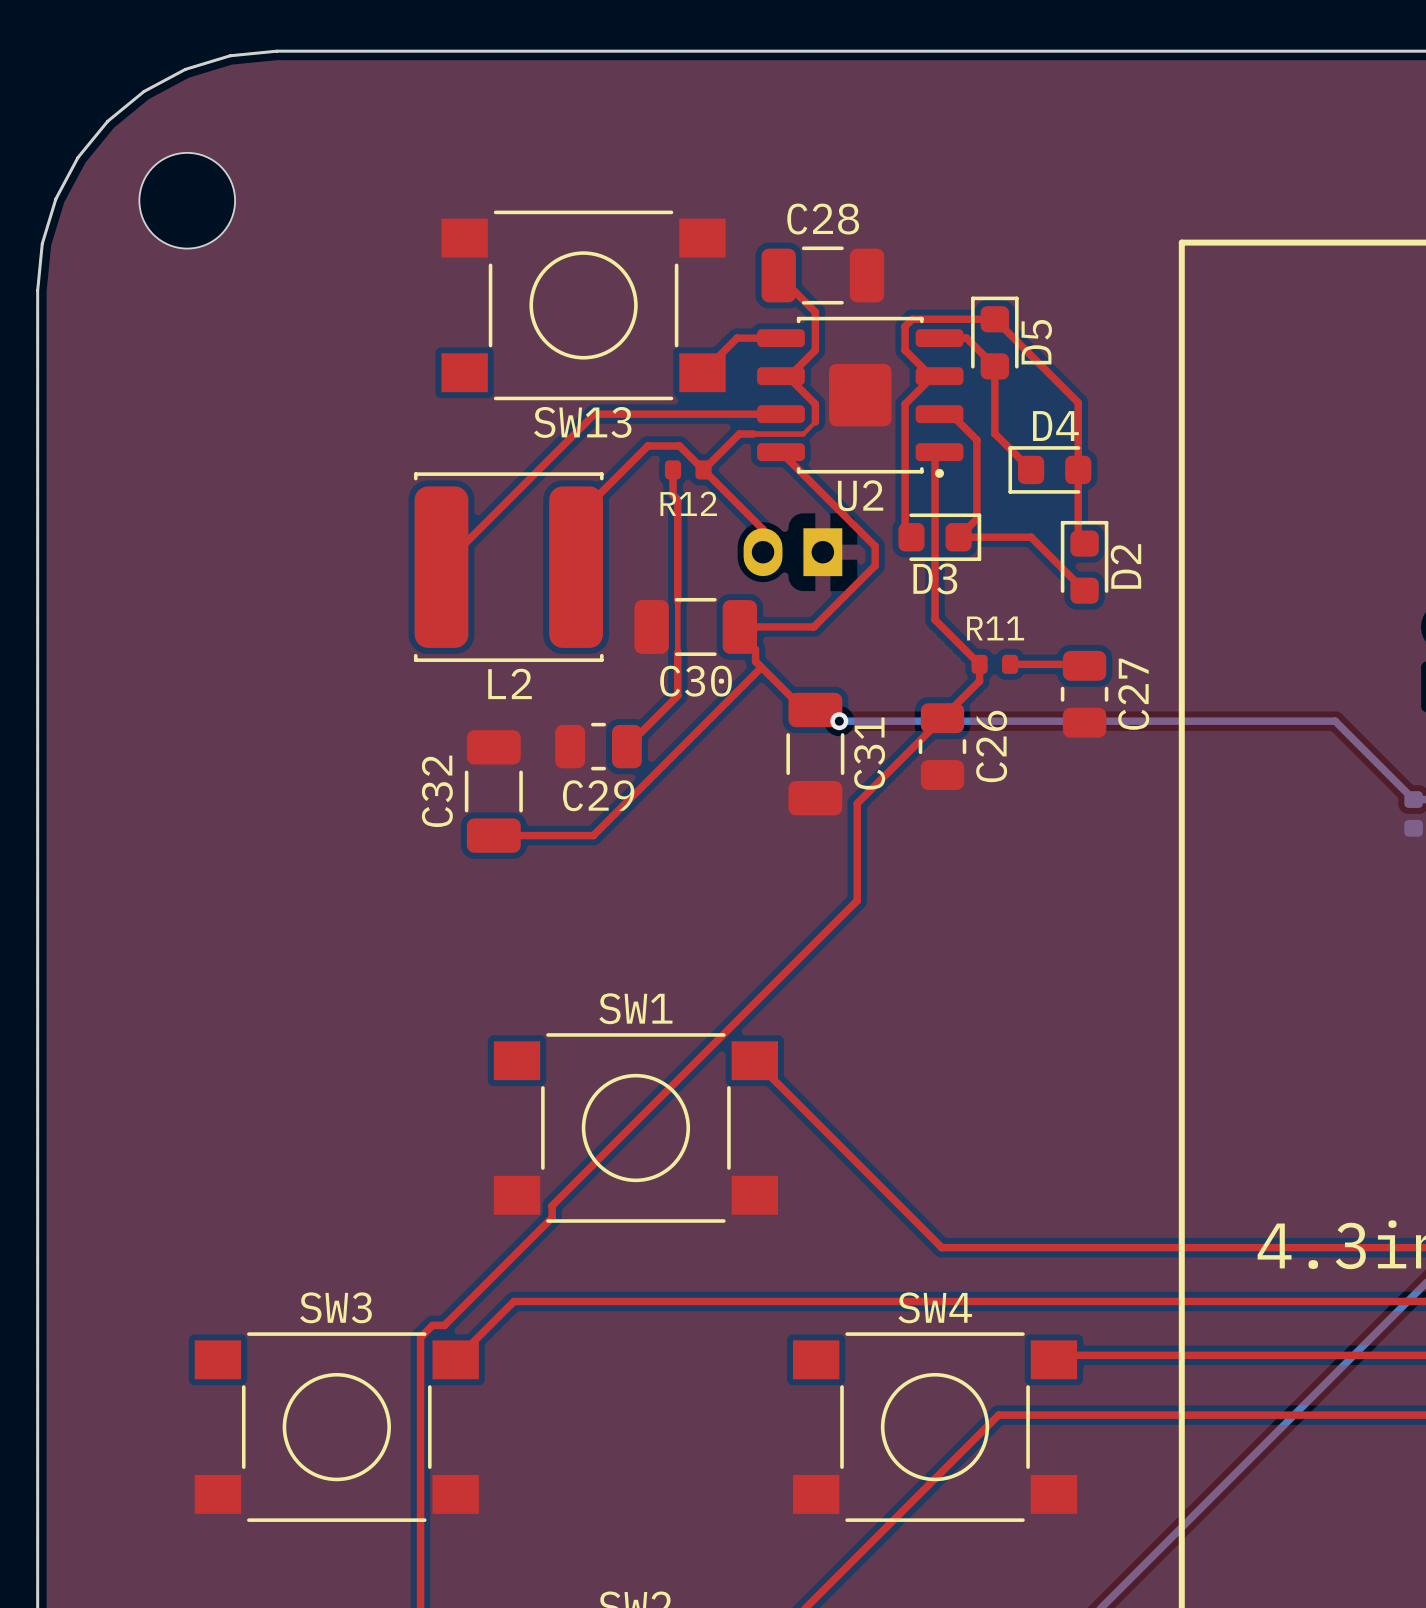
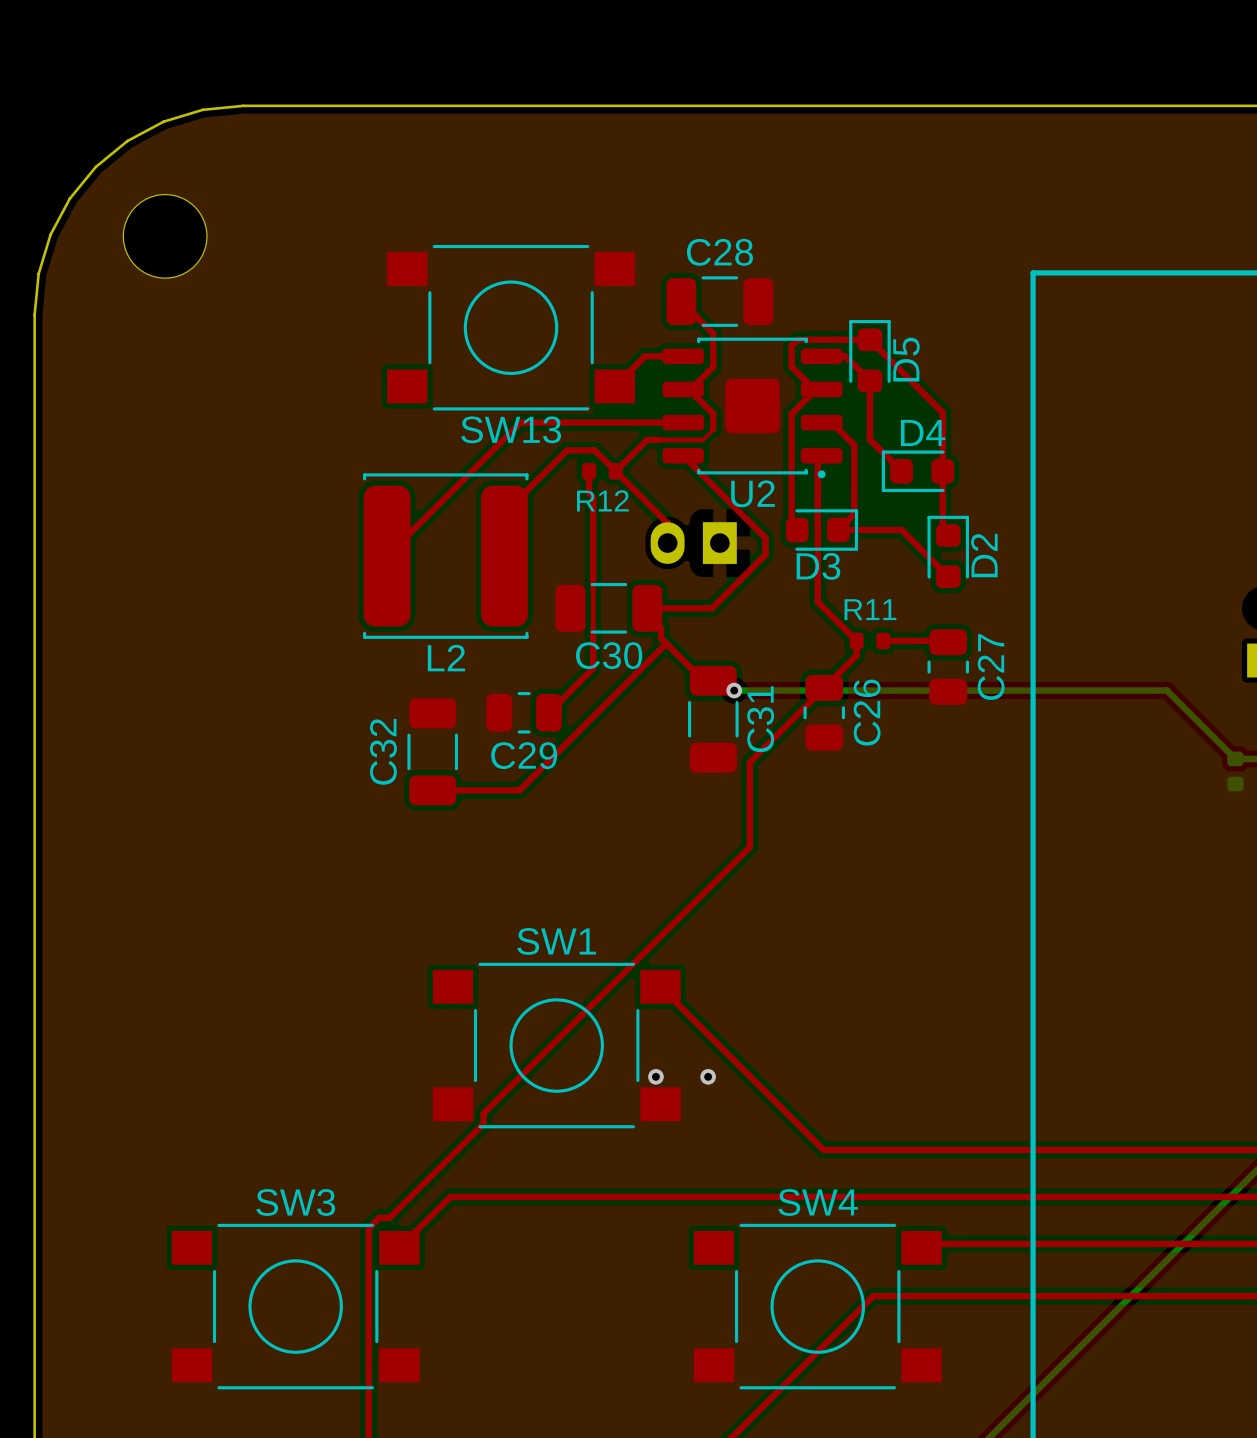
via: none -> (655, 1076)
via: none -> (708, 1076)

